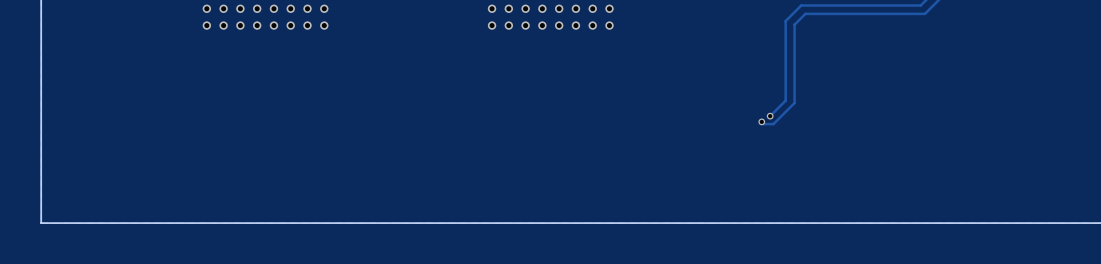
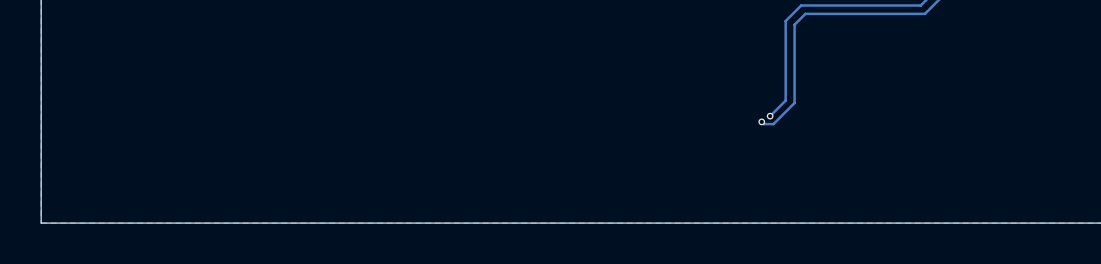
via: (206, 8) -> none
via: (223, 8) -> none
via: (240, 8) -> none
via: (257, 8) -> none
via: (273, 8) -> none
via: (290, 8) -> none
via: (307, 8) -> none
via: (324, 8) -> none
via: (492, 8) -> none
via: (508, 8) -> none
via: (525, 8) -> none
via: (542, 8) -> none
via: (559, 8) -> none
via: (575, 8) -> none
via: (592, 8) -> none
via: (609, 8) -> none
via: (206, 25) -> none
via: (223, 25) -> none
via: (240, 25) -> none
via: (257, 25) -> none
via: (273, 25) -> none
via: (290, 25) -> none
via: (307, 25) -> none
via: (324, 25) -> none
via: (492, 25) -> none
via: (508, 25) -> none
via: (525, 25) -> none
via: (542, 25) -> none
via: (559, 25) -> none
via: (575, 25) -> none
via: (592, 25) -> none
via: (609, 25) -> none

